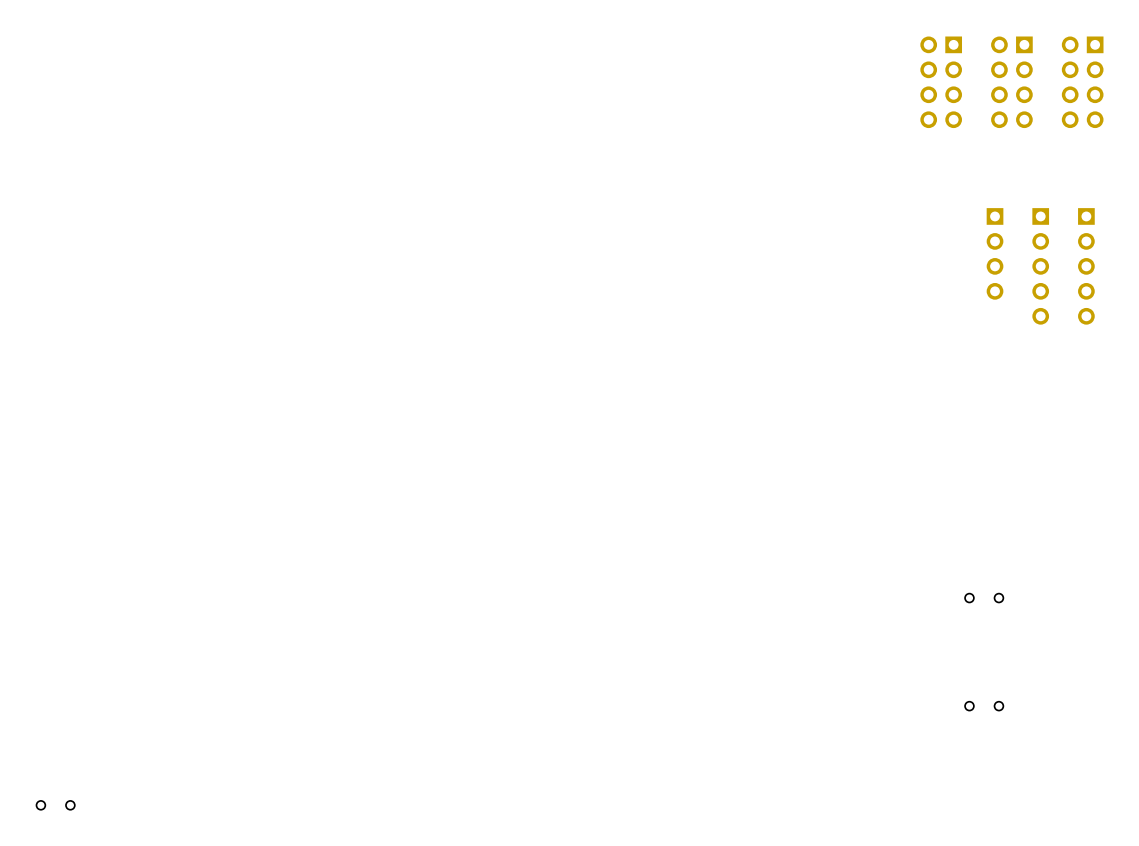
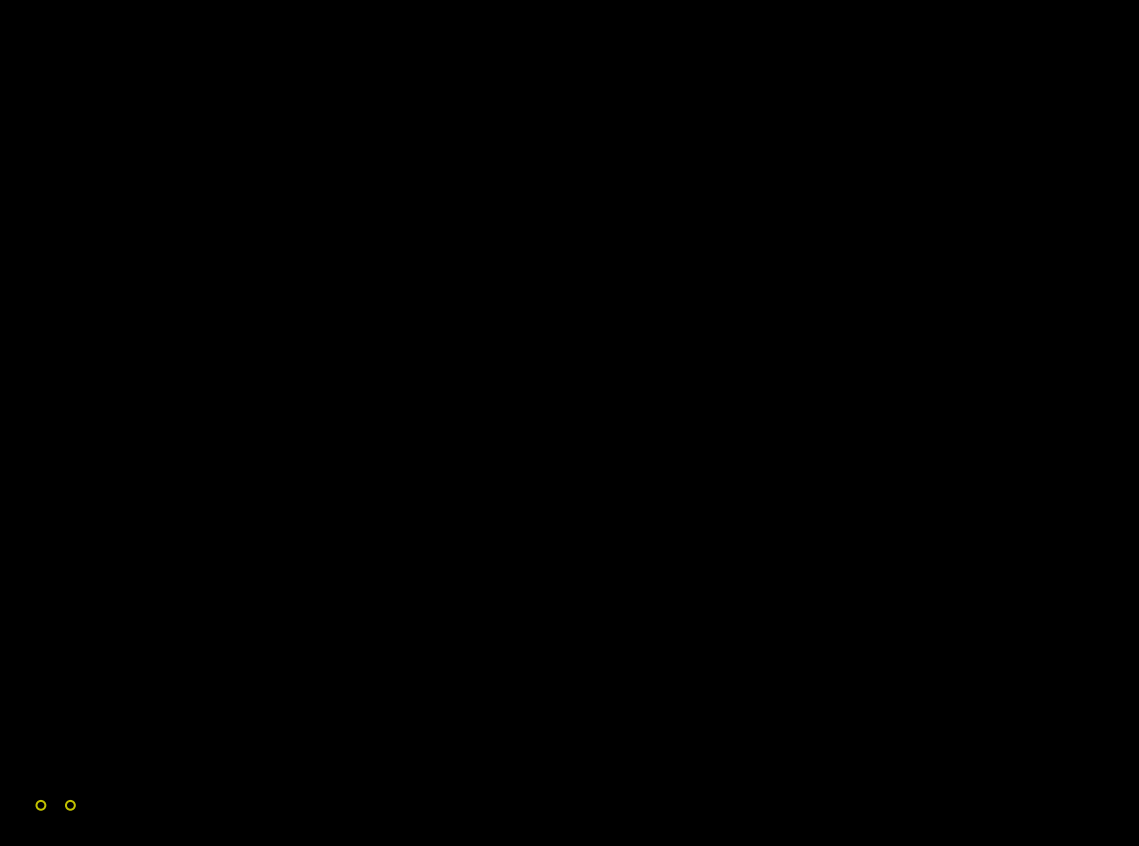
part: (941, 82) -> none
part: (1011, 82) -> none
part: (1082, 82) -> none
part: (995, 253) -> none
part: (1040, 266) -> none
part: (1086, 266) -> none
part: (984, 598) -> none
part: (984, 706) -> none

